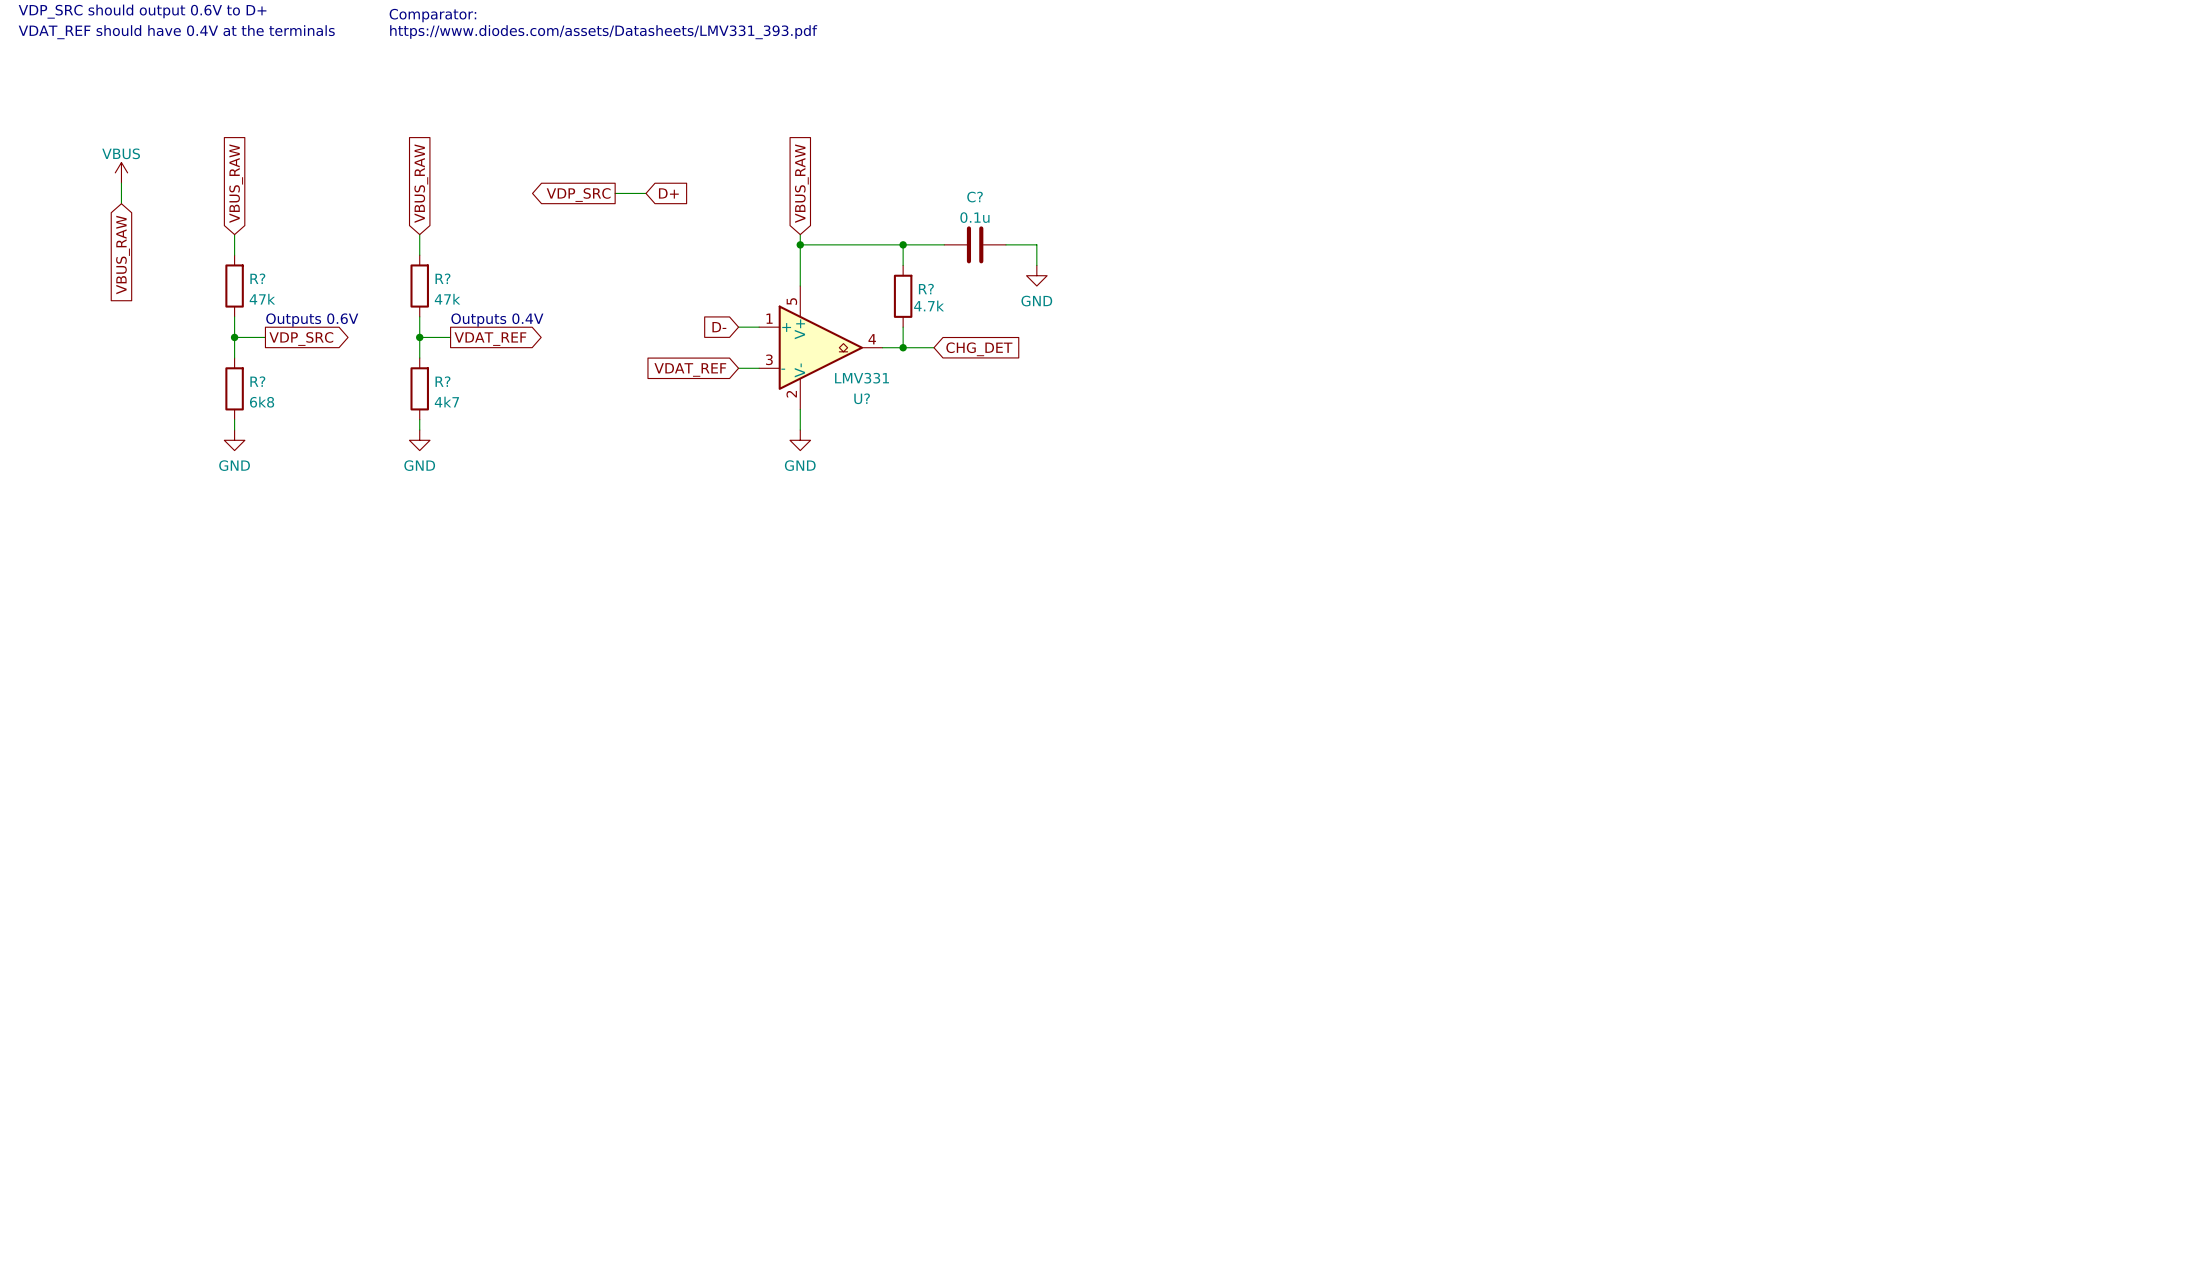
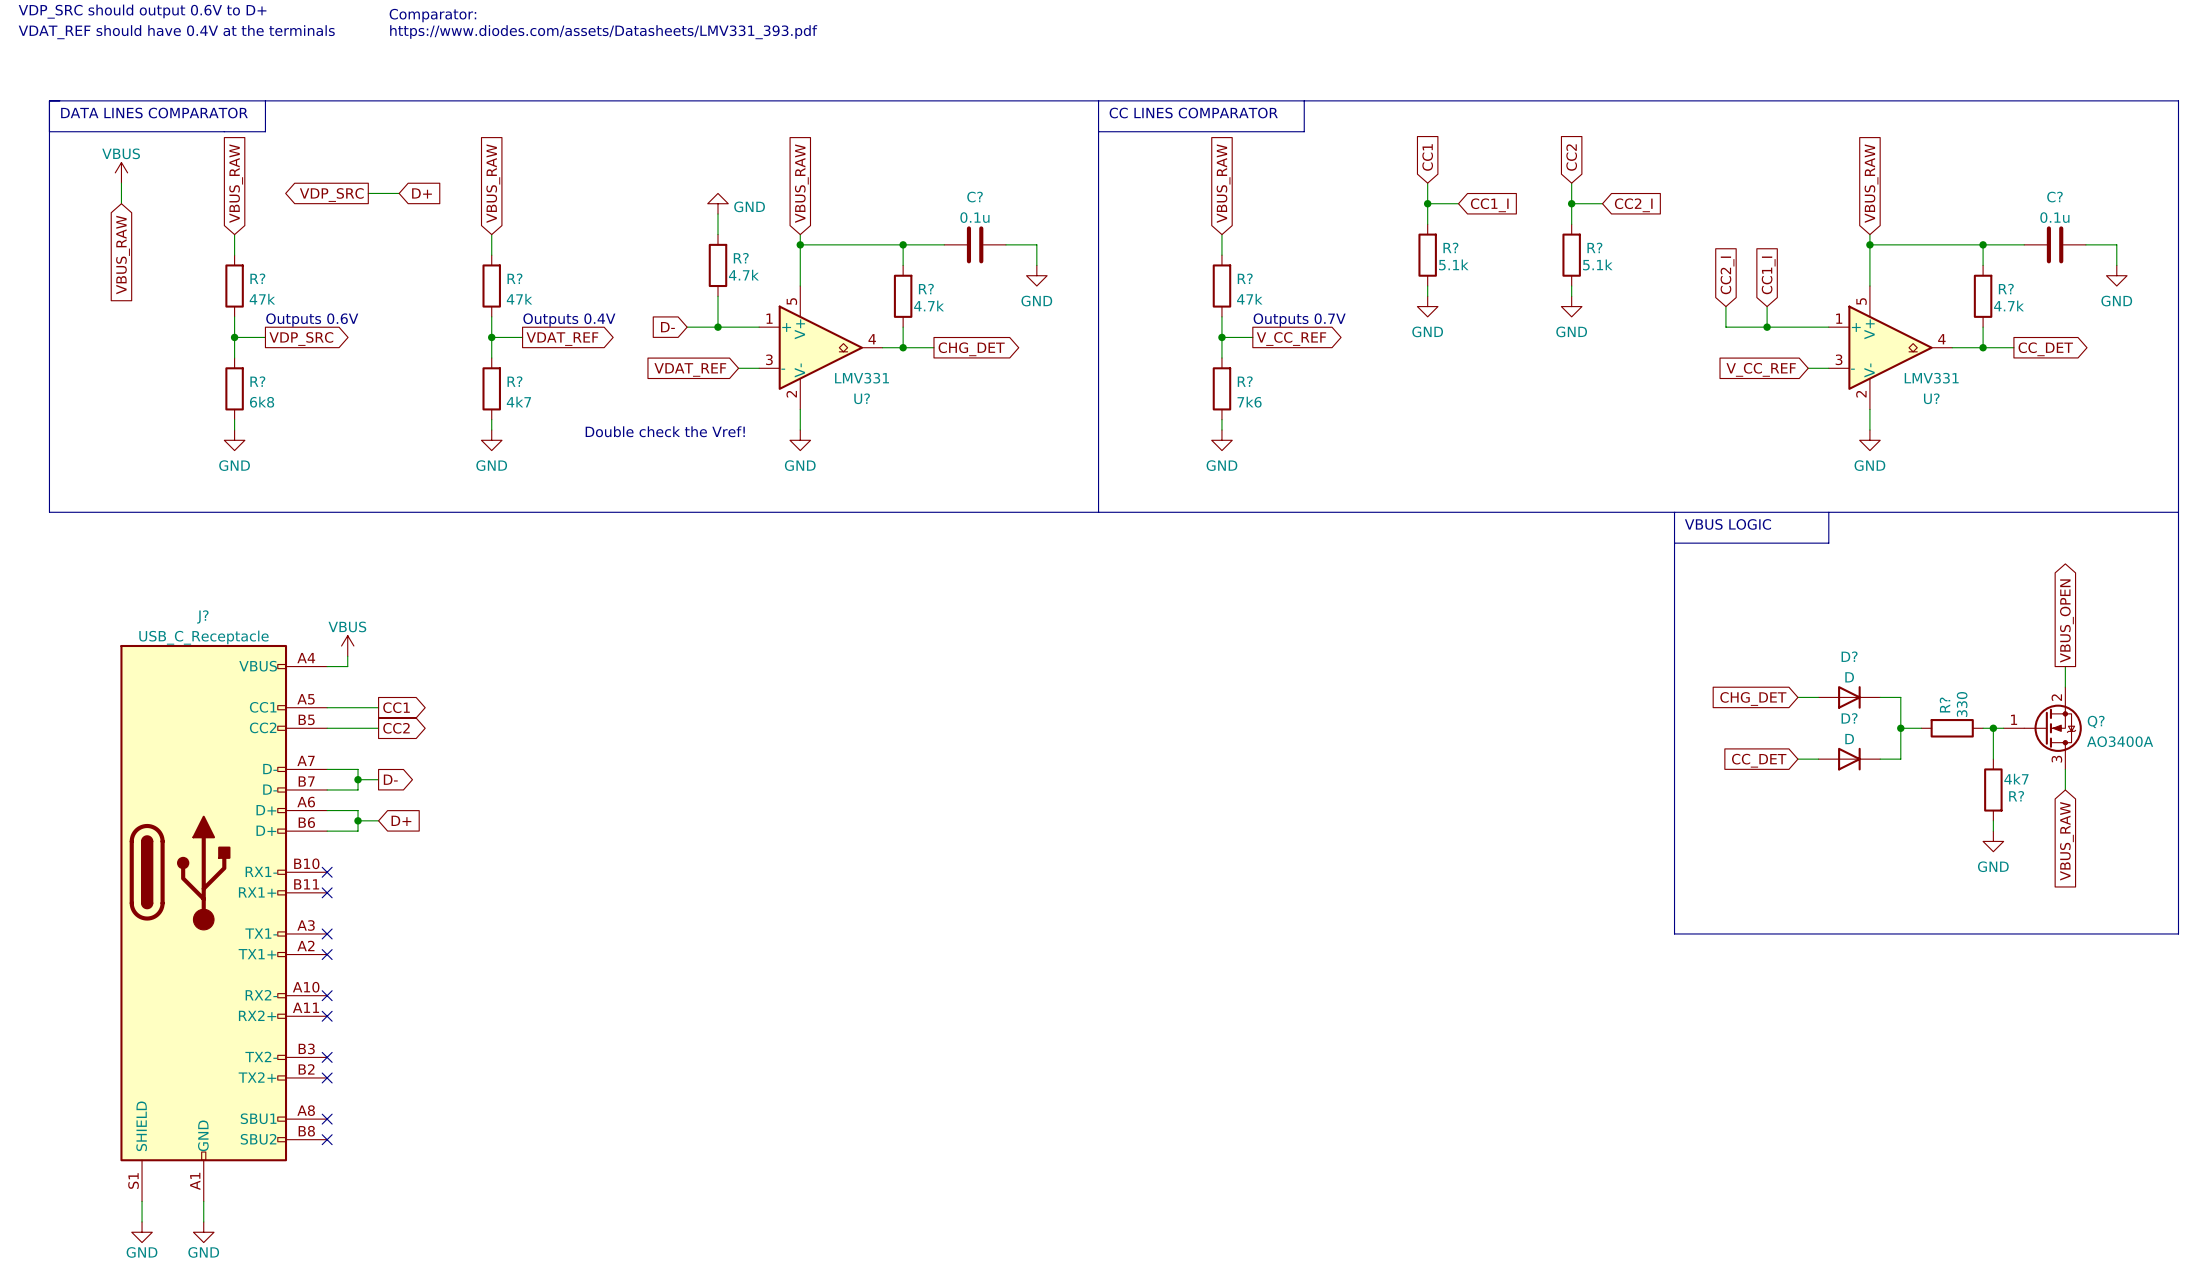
line: none -> (265, 100) (265, 131) (49, 131)
line: none -> (1098, 100) (1098, 512)
line: none -> (1304, 100) (1304, 131) (1098, 131)
text: none -> DATA LINES COMPARATOR (154, 113)
text: none -> CC LINES COMPARATOR (1193, 113)
global label: none -> CC1 (1427, 157)
global label: none -> CC2 (1571, 157)
global label position: VBUS_RAW (421, 183) -> VBUS_RAW (493, 183)
global label: none -> VBUS_RAW (1223, 183)
wire: none -> (1427, 183) (1427, 224)
wire: none -> (1571, 183) (1571, 224)
global label: none -> VBUS_RAW (1871, 183)
wire: none -> (368, 193) (399, 193)
global label: none -> D+ (422, 193)
wire: (615, 193) (646, 193) -> none
global label: D+ (668, 193) -> none
global label: none -> VDP_SRC (331, 195)
global label: VDP_SRC (578, 195) -> none
power symbol: none -> GND (717, 203)
wire: none -> (1427, 203) (1458, 203)
junction: none -> (1427, 203)
wire: none -> (1571, 203) (1602, 203)
junction: none -> (1571, 203)
global label: none -> CC1_I (1489, 205)
global label: none -> CC2_I (1633, 205)
wire: none -> (717, 214) (717, 234)
wire: (419, 234) (419, 255) -> (491, 234) (491, 255)
wire: none -> (1221, 234) (1221, 255)
wire: none -> (1869, 234) (1869, 286)
wire: none -> (1869, 244) (2024, 244)
junction: none -> (1869, 244)
wire: none -> (1983, 244) (1983, 265)
junction: none -> (1983, 244)
C?: none -> 0.1u (2055, 244)
wire: none -> (2085, 244) (2116, 244) (2116, 265)
R?: none -> 5.1k (1427, 255)
R?: none -> 5.1k (1571, 255)
R?: none -> 4.7k (717, 265)
global label: none -> CC2_I (1727, 275)
global label: none -> CC1_I (1768, 275)
power symbol: none -> GND (2116, 275)
R? position: (419, 286) -> (491, 286)
R?: none -> 47k (1221, 286)
wire: none -> (1427, 286) (1427, 296)
wire: none -> (1571, 286) (1571, 296)
wire: none -> (717, 296) (717, 327)
R?: none -> 4.7k (1983, 296)
power symbol: none -> GND (1427, 306)
power symbol: none -> GND (1571, 306)
wire: none -> (1725, 306) (1725, 327) (1828, 327)
wire: none -> (1767, 306) (1767, 327)
wire: (419, 316) (419, 358) -> (491, 316) (491, 358)
wire: none -> (1221, 316) (1221, 358)
text position: Outputs 0.4V (497, 320) -> Outputs 0.4V (569, 320)
text: none -> Outputs 0.7V (1299, 320)
wire: none -> (687, 327) (738, 327)
junction: none -> (717, 327)
global label position: D- (719, 327) -> D- (667, 327)
junction: none -> (1767, 327)
wire: none -> (1983, 327) (1983, 347)
wire: (419, 337) (450, 337) -> (491, 337) (522, 337)
junction: (419, 337) -> none
junction: none -> (491, 337)
wire: none -> (1221, 337) (1252, 337)
junction: none -> (1221, 337)
global label position: VDAT_REF (490, 339) -> VDAT_REF (562, 339)
global label: none -> V_CC_REF (1291, 339)
U?: none -> LMV331 (1890, 347)
wire: none -> (1952, 347) (2013, 347)
junction: none -> (1983, 347)
global label shape: input (979, 349) -> output (971, 349)
global label: none -> CC_DET (2045, 349)
wire: none -> (1808, 368) (1828, 368)
global label: none -> V_CC_REF (1761, 369)
R? position: (419, 388) -> (491, 388)
R?: none -> 7k6 (1221, 388)
wire: none -> (1869, 409) (1869, 430)
wire: (419, 419) (419, 430) -> (491, 419) (491, 430)
wire: none -> (1221, 419) (1221, 430)
text: none -> Double check the Vref! (665, 431)
power symbol position: GND (419, 440) -> GND (491, 440)
power symbol: none -> GND (1221, 440)
power symbol: none -> GND (1869, 440)
line: none -> (1674, 512) (1674, 933) (2178, 933) (2178, 100) (49, 100) (49, 512) (2178, 512)
line: none -> (1828, 512) (1828, 543) (1674, 543)
text: none -> VBUS LOGIC (1727, 524)
global label: none -> VBUS_OPEN (2066, 620)
power symbol: none -> VBUS (347, 645)
wire: none -> (347, 656) (347, 666) (327, 666)
wire: none -> (2065, 666) (2065, 687)
wire: none -> (1797, 697) (1818, 697)
D?: none -> D (1849, 697)
wire: none -> (1880, 697) (1900, 697) (1900, 759) (1880, 759)
global label: none -> CHG_DET (1753, 698)
wire: none -> (327, 707) (378, 707)
global label: none -> CC1 (396, 707)
wire: none -> (327, 728) (378, 728)
global label: none -> CC2 (396, 728)
wire: none -> (1900, 728) (1921, 728)
junction: none -> (1900, 728)
R?: none -> 330 (1952, 728)
wire: none -> (1983, 728) (2003, 728)
wire: none -> (1993, 728) (1993, 759)
junction: none -> (1993, 728)
Q?: none -> AO3400A (2042, 728)
wire: none -> (1797, 759) (1818, 759)
D?: none -> D (1849, 759)
global label: none -> CC_DET (1759, 760)
wire: none -> (327, 769) (358, 769) (358, 789) (327, 789)
wire: none -> (2065, 769) (2065, 789)
wire: none -> (358, 779) (378, 779)
junction: none -> (358, 779)
global label: none -> D- (390, 779)
R?: none -> 4k7 (1993, 789)
wire: none -> (327, 810) (358, 810) (358, 831) (327, 831)
wire: none -> (358, 820) (378, 820)
junction: none -> (358, 820)
global label: none -> D+ (401, 820)
wire: none -> (1993, 820) (1993, 831)
power symbol: none -> GND (1993, 841)
global label: none -> VBUS_RAW (2066, 841)
no-connect mark: none -> (327, 872)
no-connect mark: none -> (327, 892)
J?: none -> USB_C_Receptacle (223, 923)
no-connect mark: none -> (327, 933)
no-connect mark: none -> (327, 954)
no-connect mark: none -> (327, 995)
no-connect mark: none -> (327, 1016)
no-connect mark: none -> (327, 1057)
no-connect mark: none -> (327, 1077)
no-connect mark: none -> (327, 1119)
no-connect mark: none -> (327, 1139)
wire: none -> (142, 1201) (142, 1221)
wire: none -> (203, 1201) (203, 1221)
power symbol: none -> GND (142, 1232)
power symbol: none -> GND (203, 1232)

